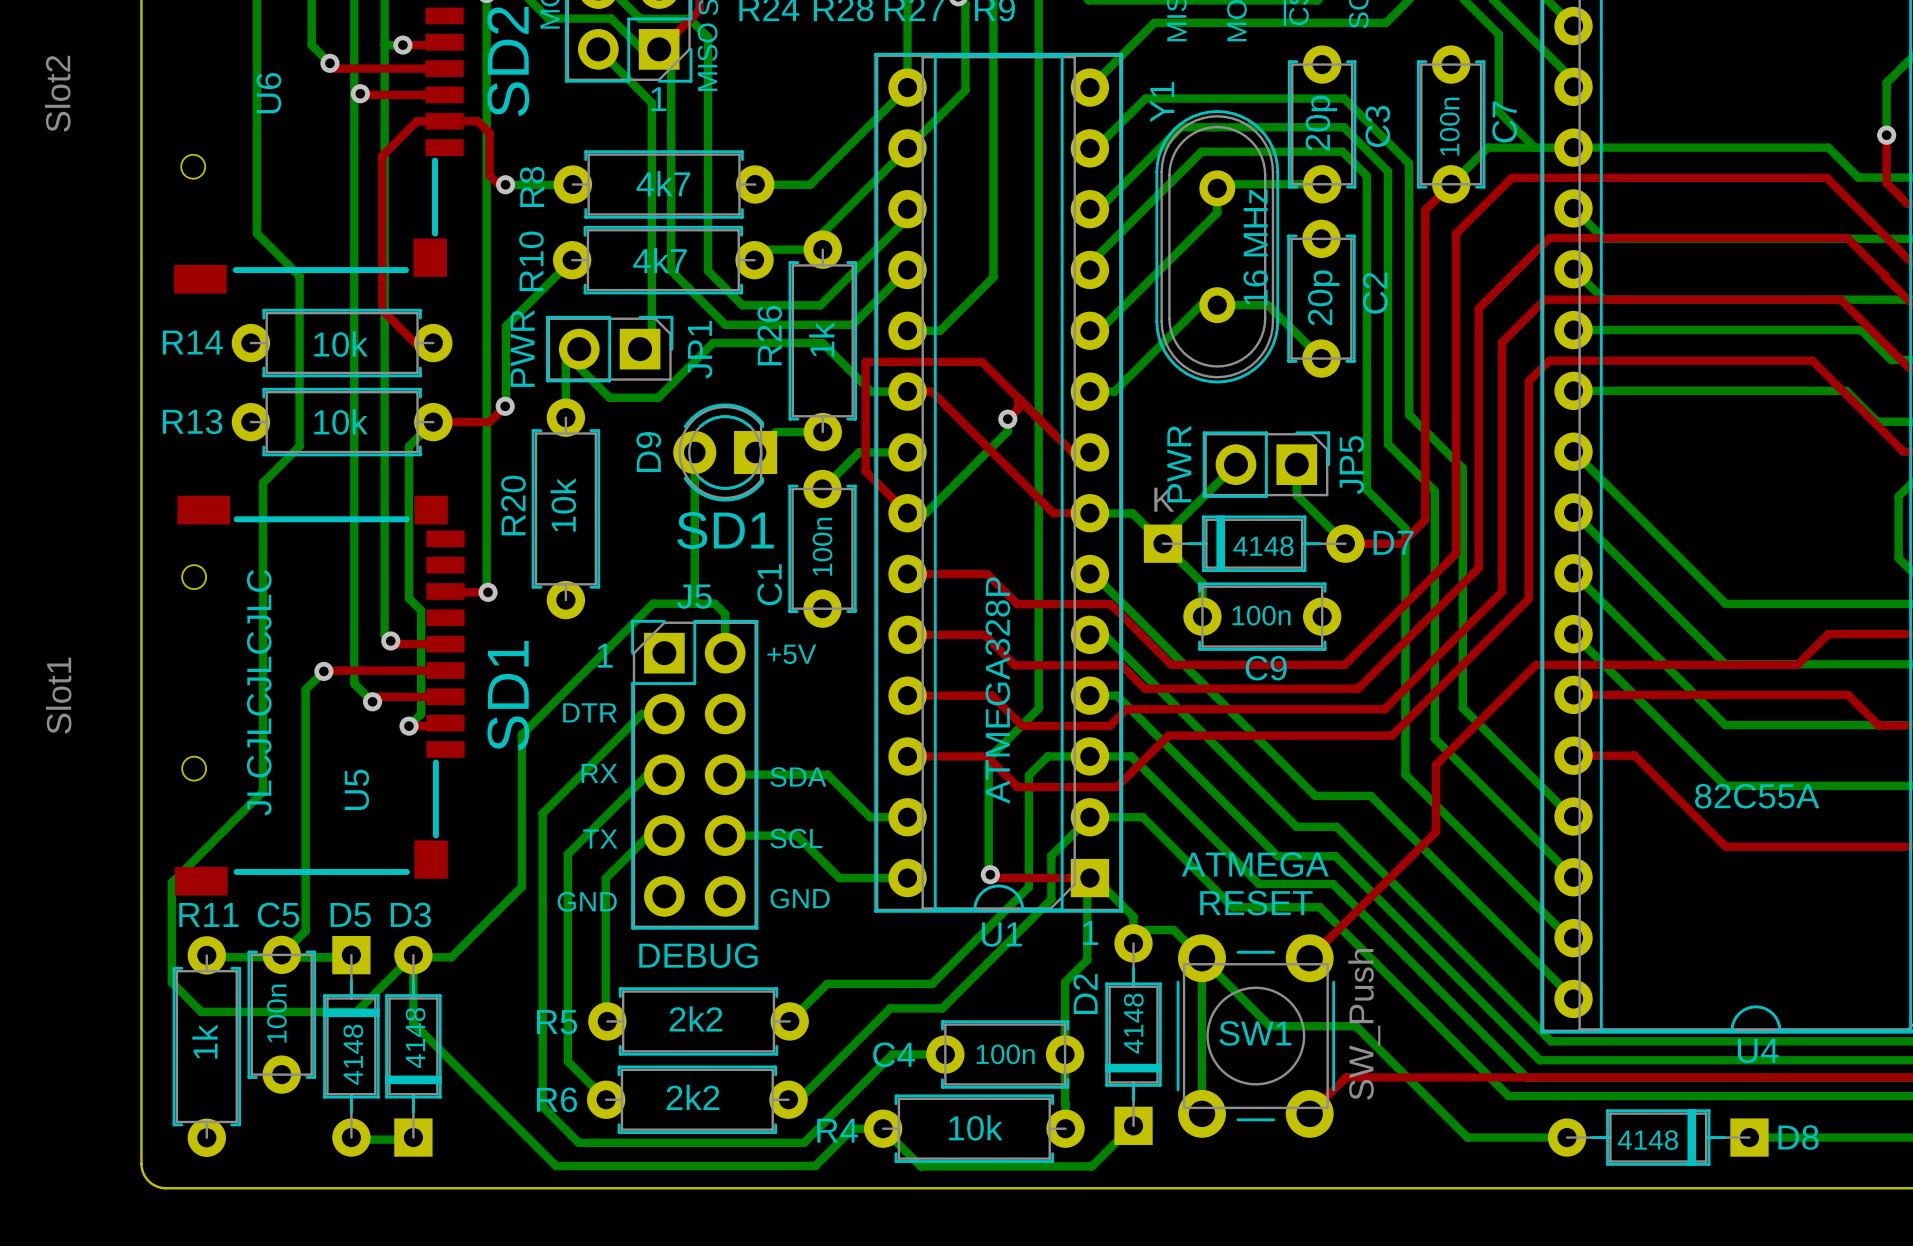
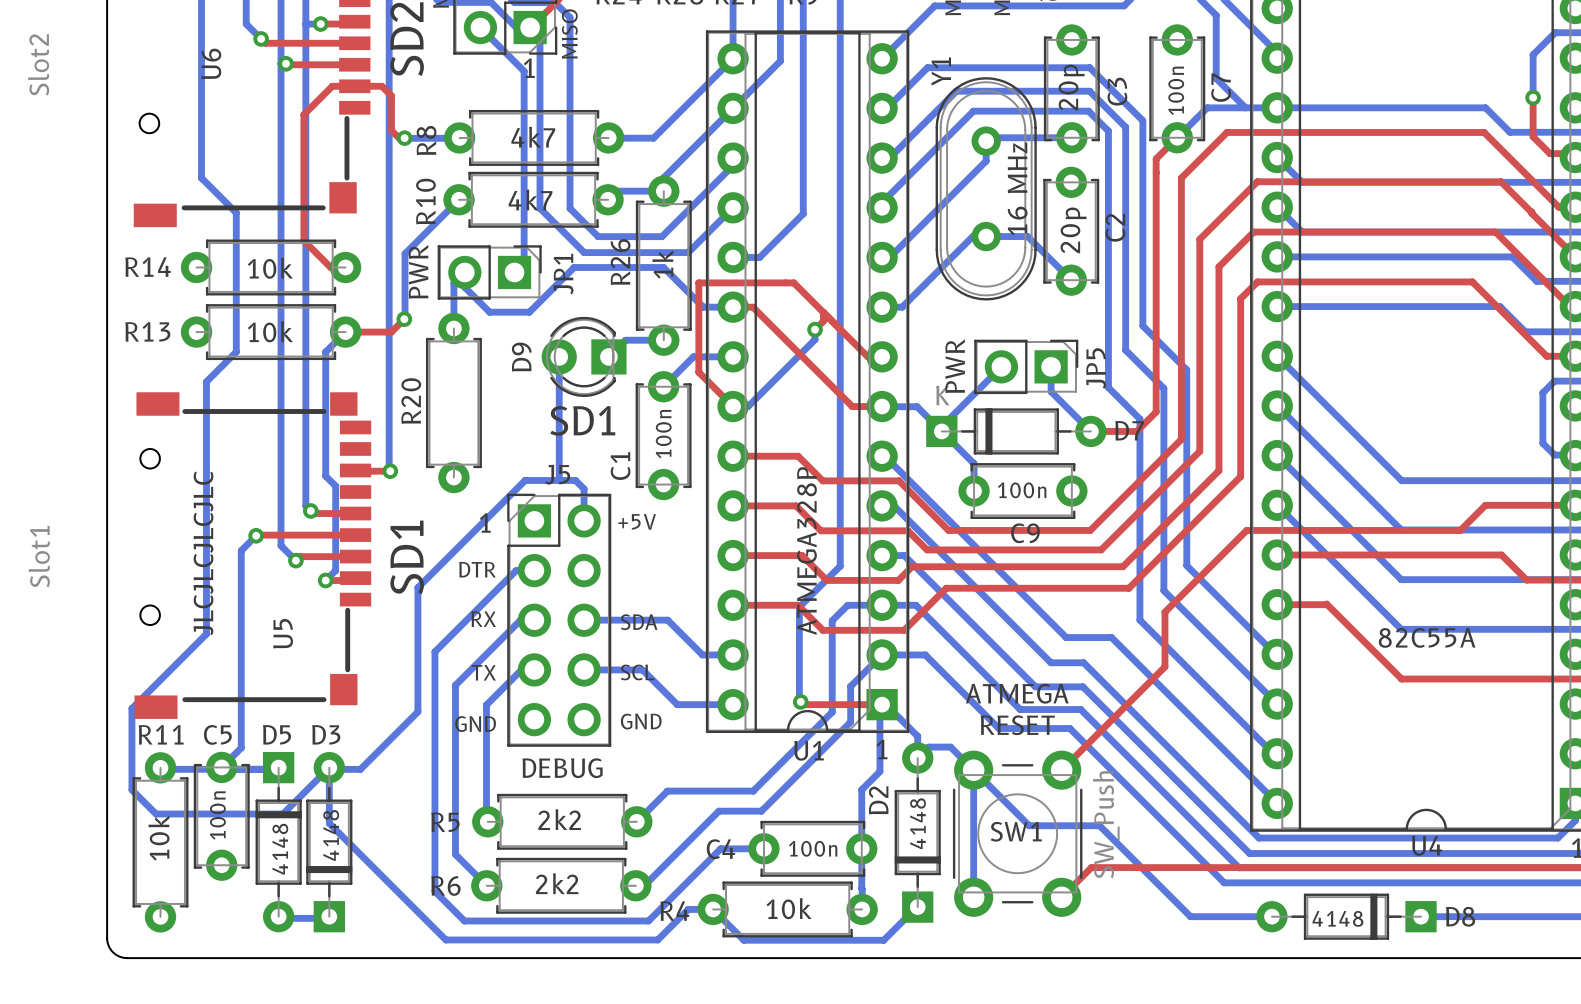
R20 value: 10k (563, 504) -> none
D7 value: 4148 (1263, 546) -> none
R11 value: 1k (204, 1041) -> 10k (159, 838)

